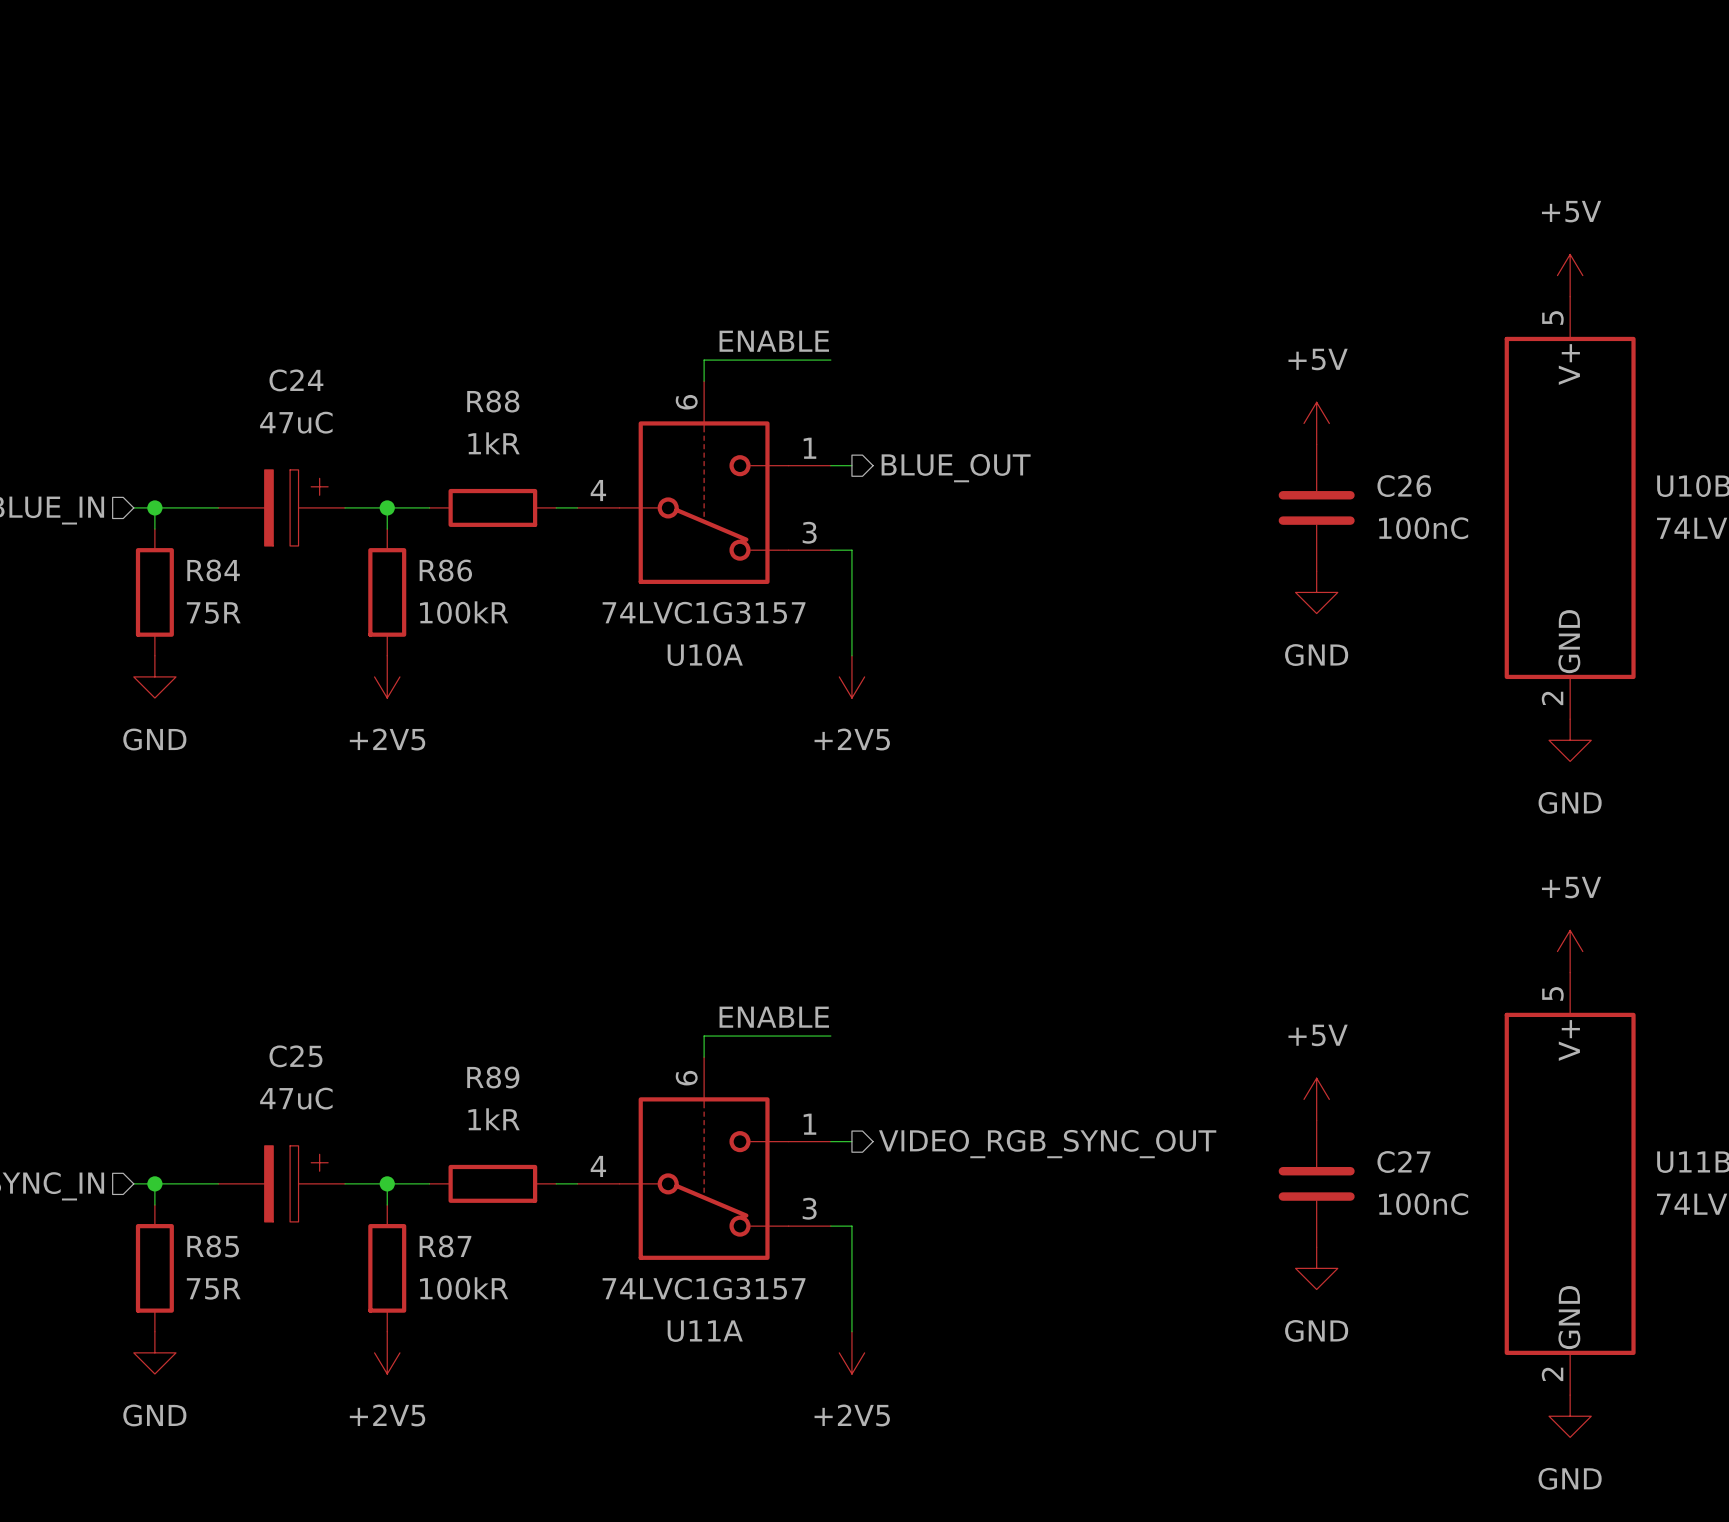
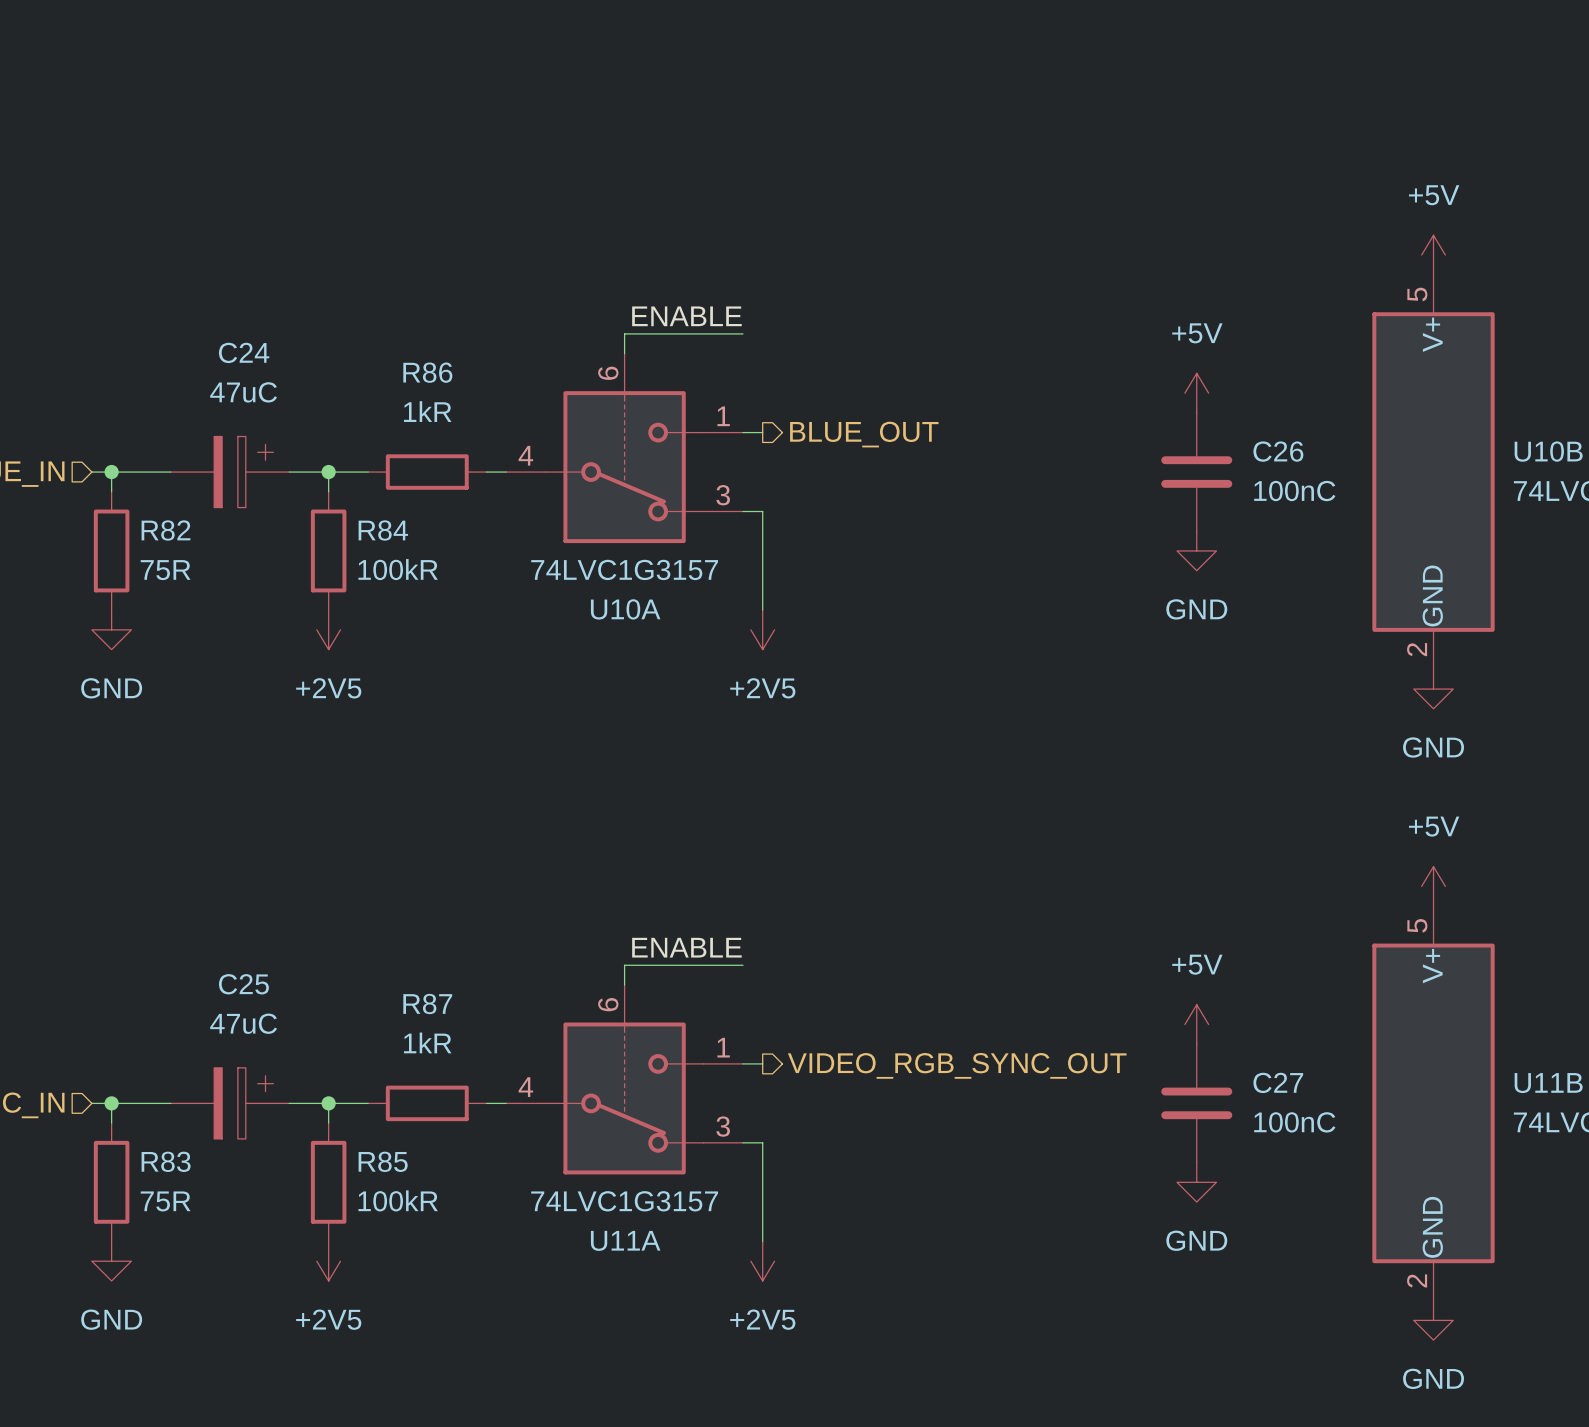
R88 name: R88 (493, 401) -> R86 (427, 372)
R84 name: R84 (213, 570) -> R82 (166, 530)
R86 name: R86 (445, 570) -> R84 (383, 530)
R89 name: R89 (493, 1077) -> R87 (427, 1004)
R85 name: R85 (213, 1246) -> R83 (166, 1161)
R87 name: R87 (445, 1246) -> R85 (383, 1161)

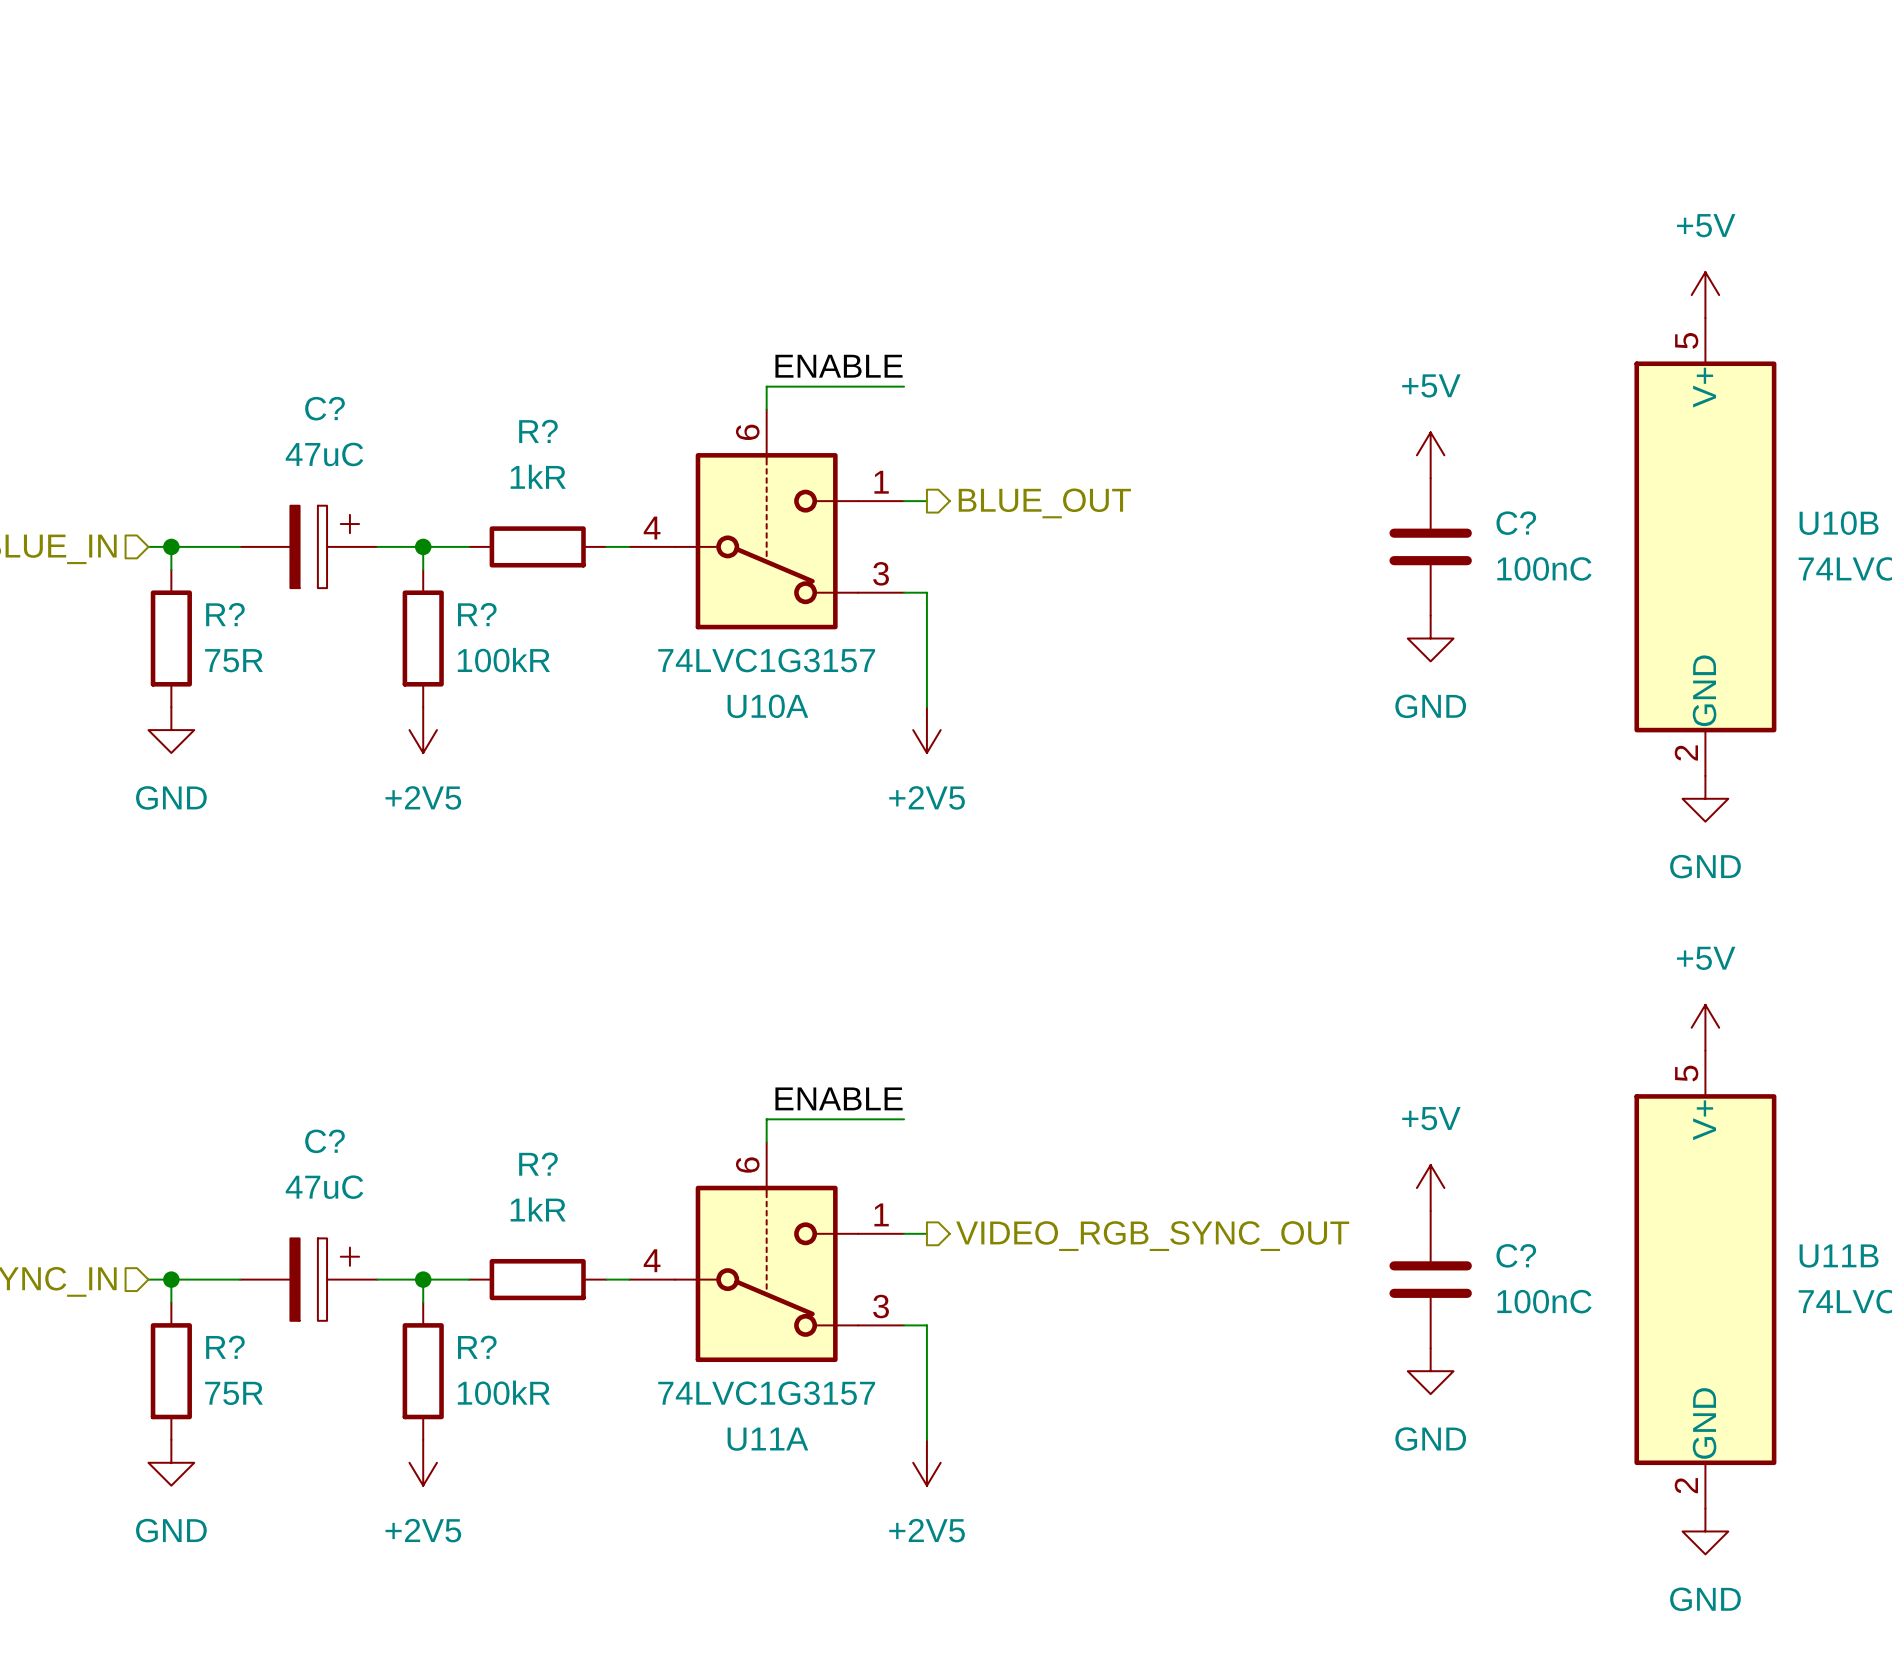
C24 name: C24 (244, 352) -> C? (324, 408)
R86 name: R86 (427, 372) -> R? (538, 431)
C26 name: C26 (1278, 451) -> C? (1516, 523)
R82 name: R82 (166, 530) -> R? (225, 614)
R84 name: R84 (383, 530) -> R? (477, 614)
C25 name: C25 (243, 984) -> C? (324, 1141)
R87 name: R87 (427, 1004) -> R? (538, 1164)
C27 name: C27 (1278, 1082) -> C? (1516, 1255)
R83 name: R83 (166, 1161) -> R? (225, 1347)
R85 name: R85 (383, 1161) -> R? (477, 1347)

